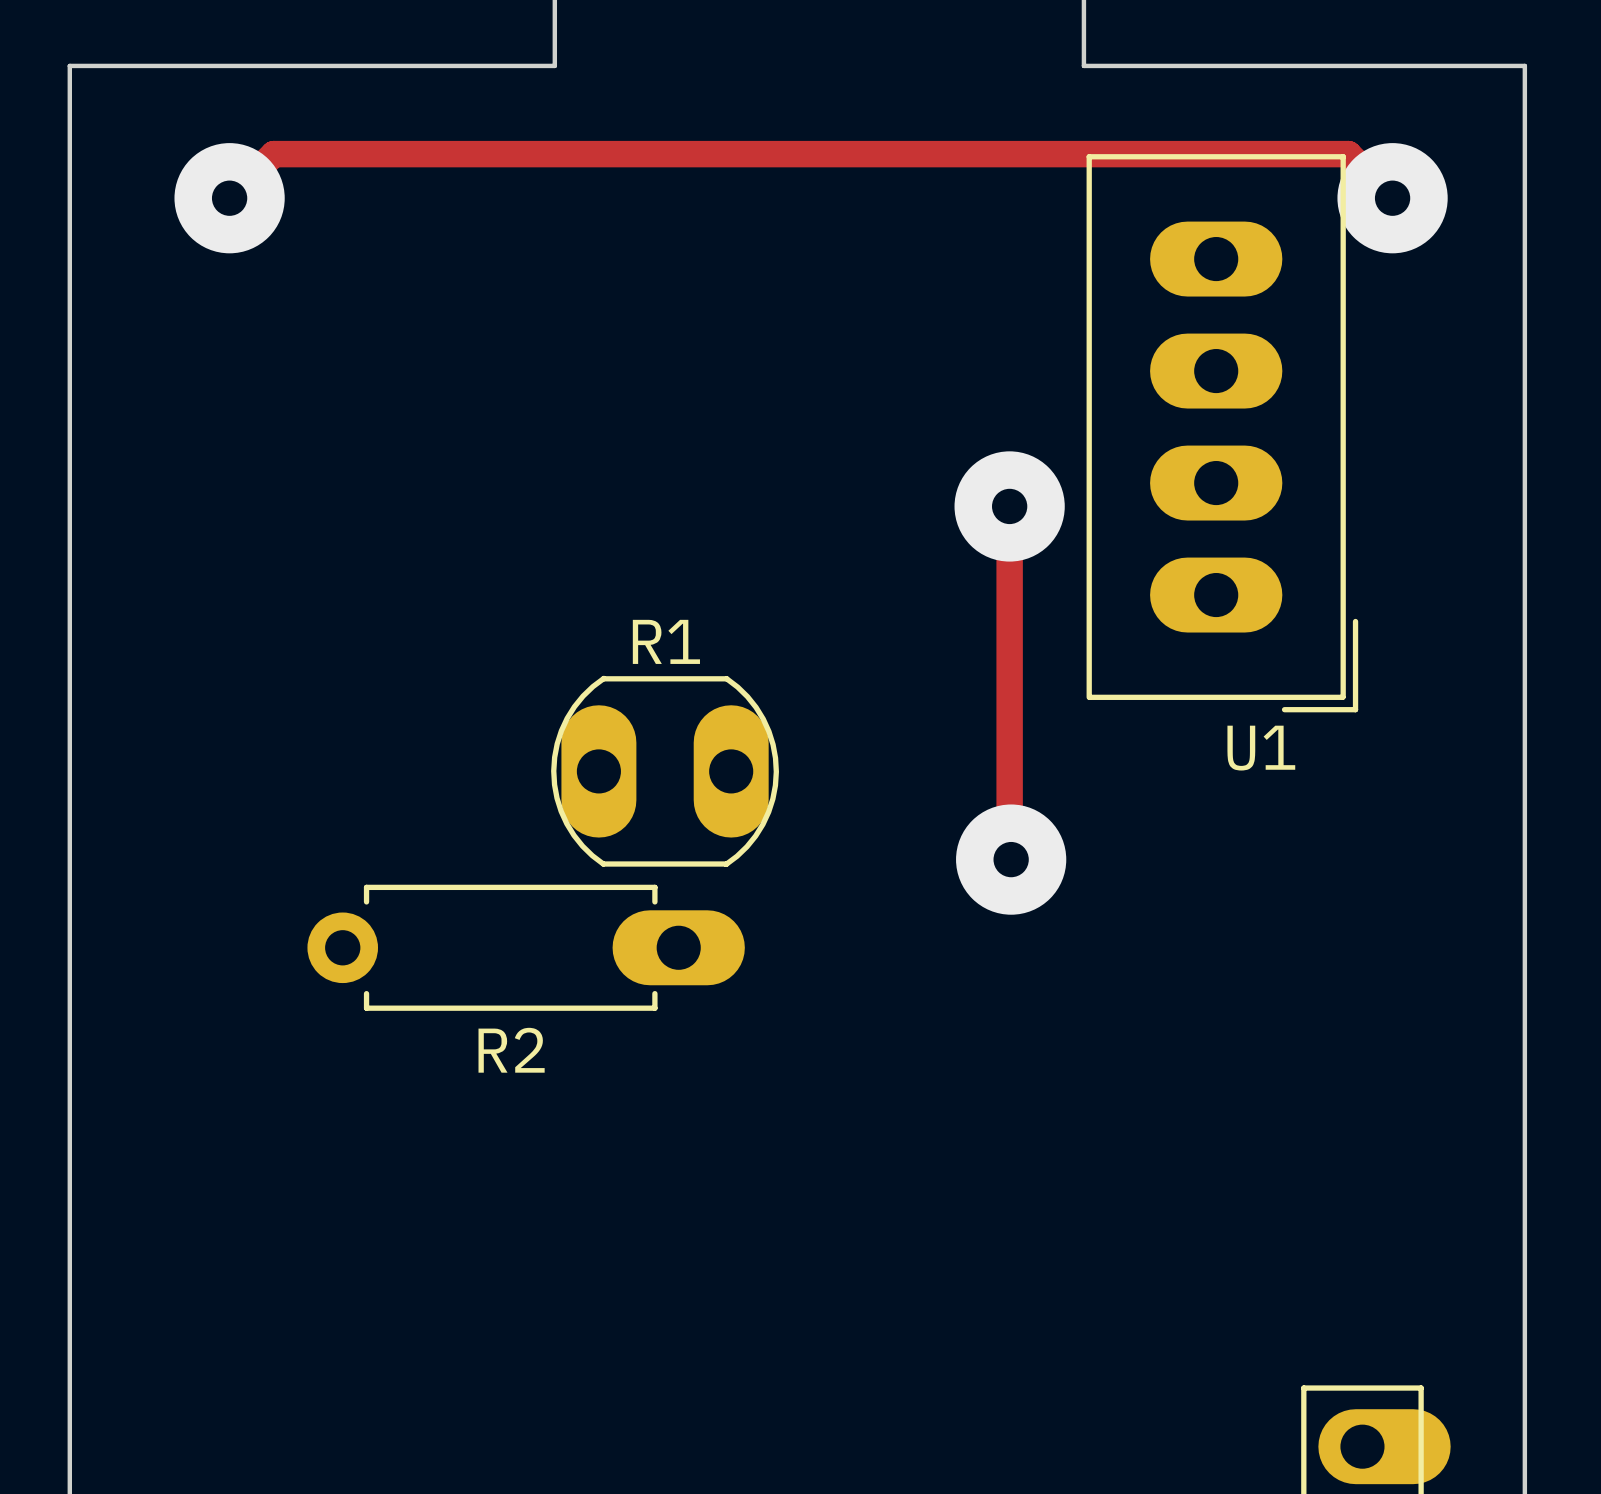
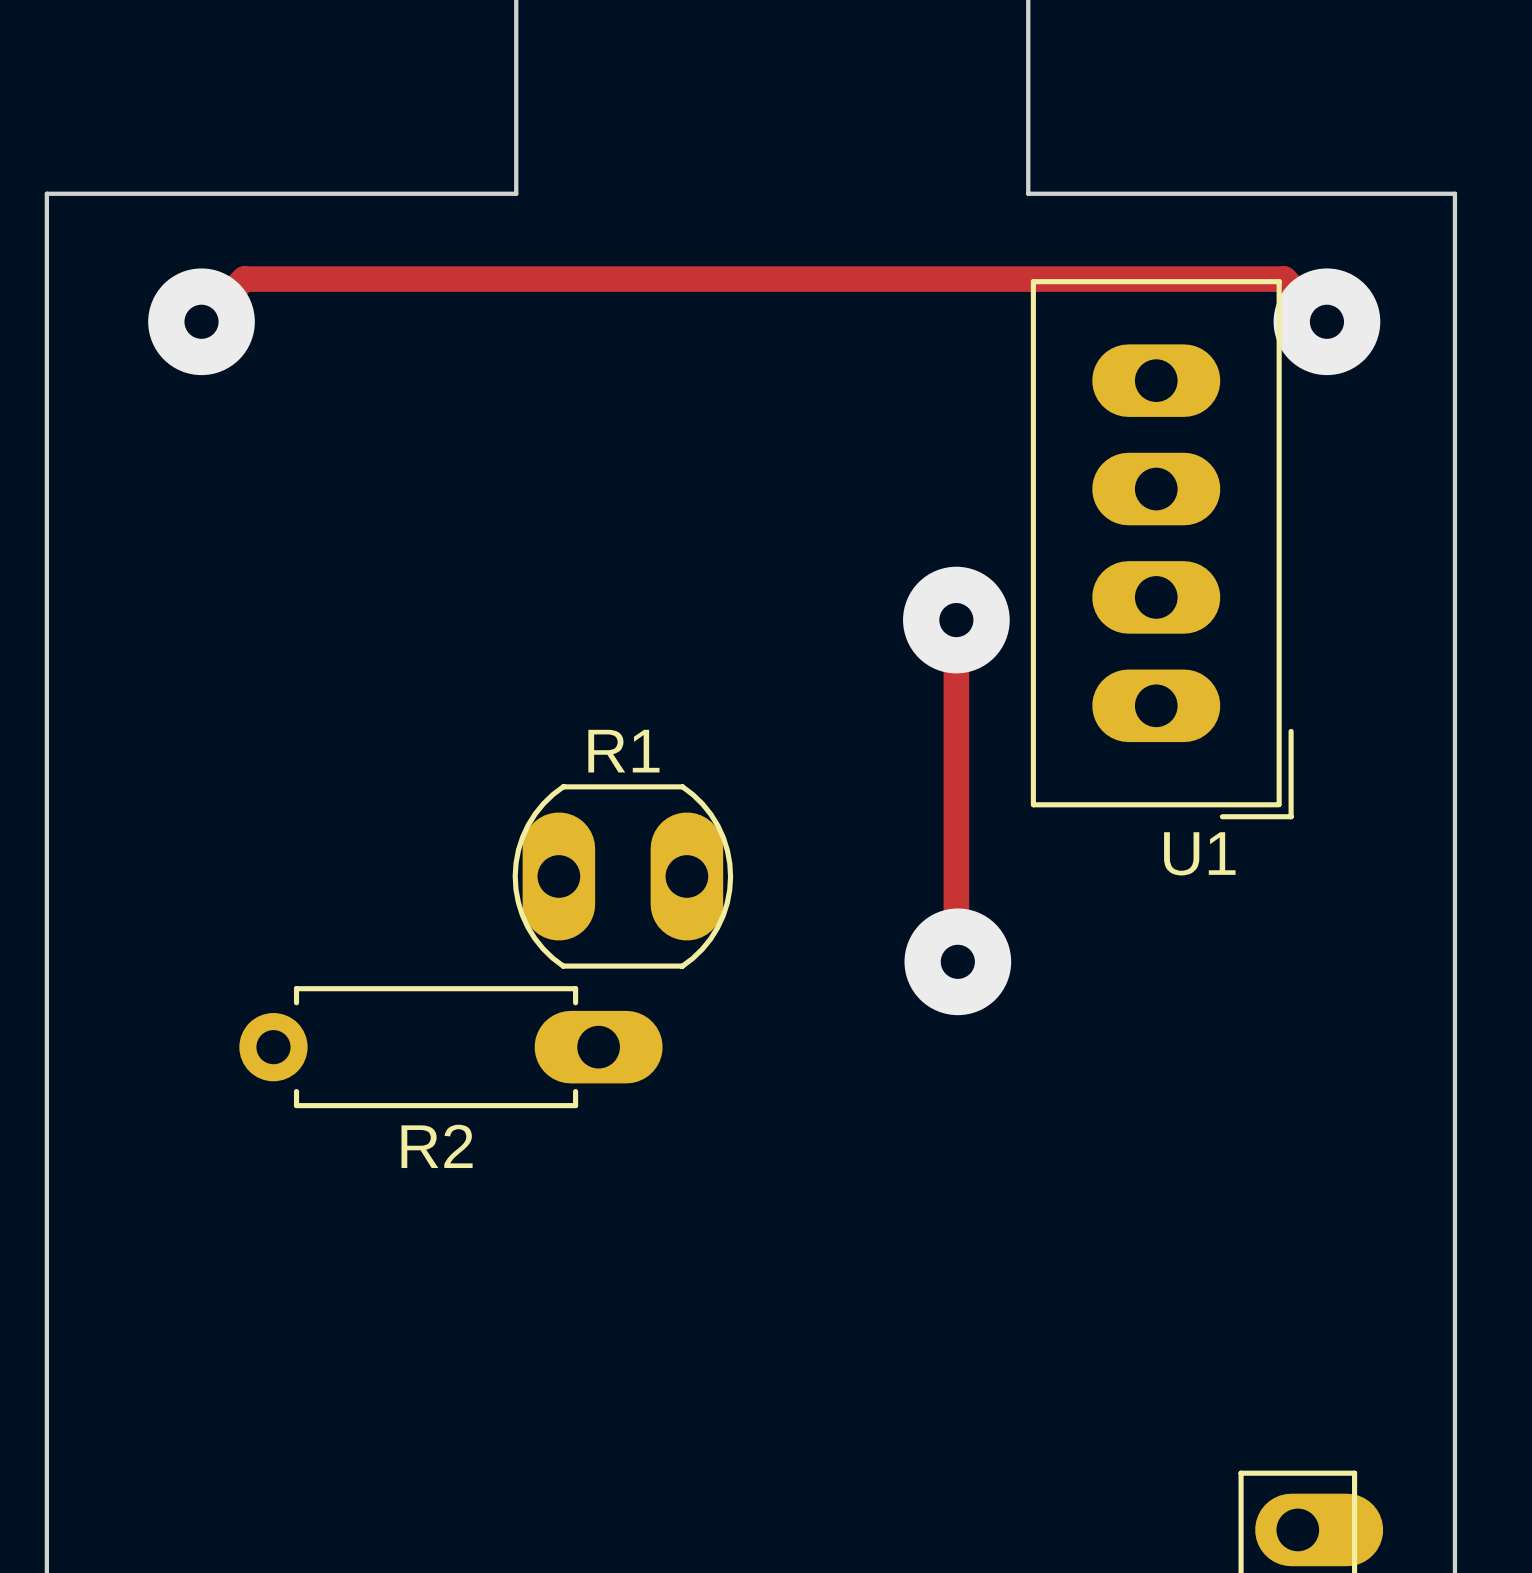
R2 position: (526, 947) -> (450, 1047)

